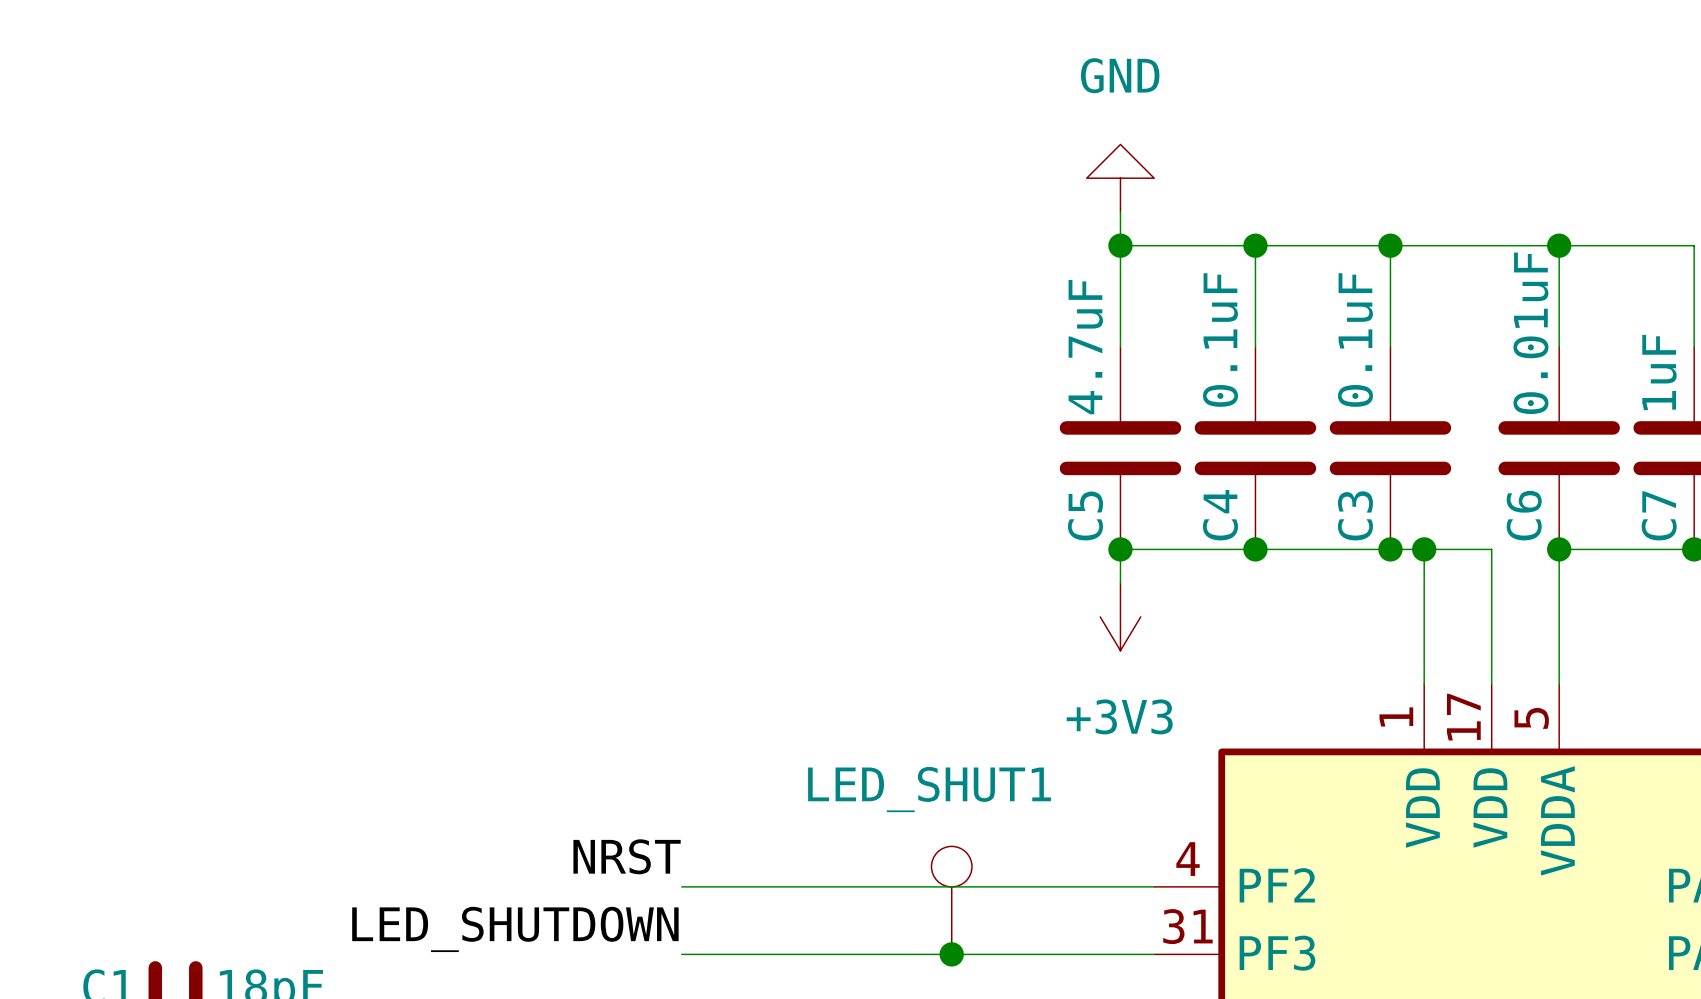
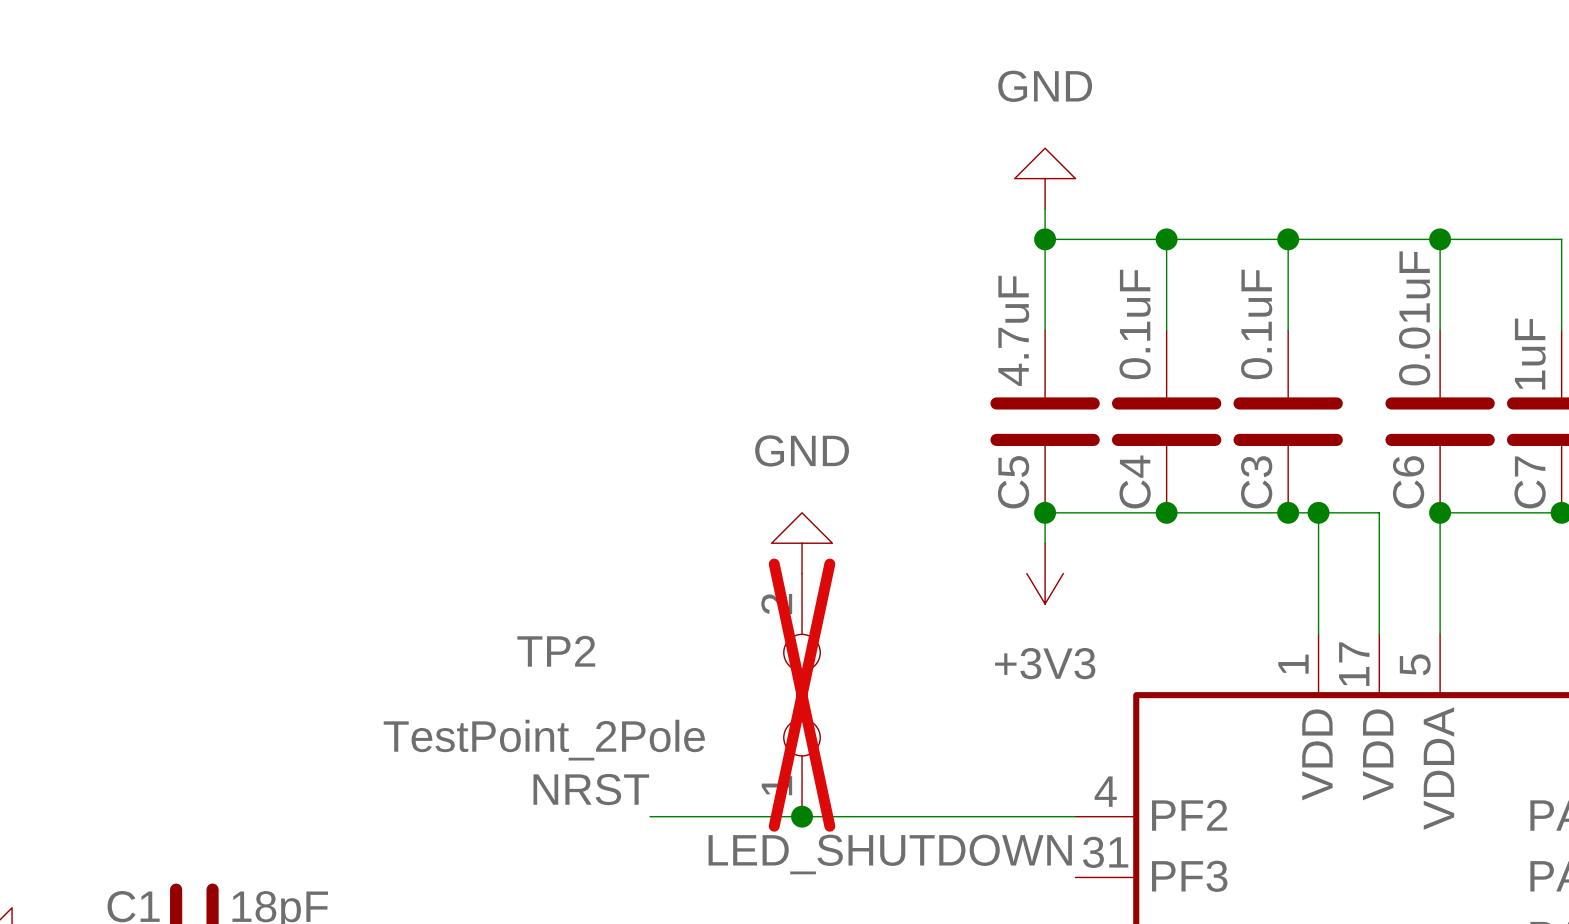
power symbol: none -> GND (802, 543)
TP2: none -> TestPoint_2Pole (802, 695)
LED_SHUT1: (951, 900) -> none
label position: LED_SHUTDOWN (515, 929) -> LED_SHUTDOWN (890, 854)
wire: (681, 954) (1154, 954) -> none
junction position: (951, 954) -> (802, 816)

